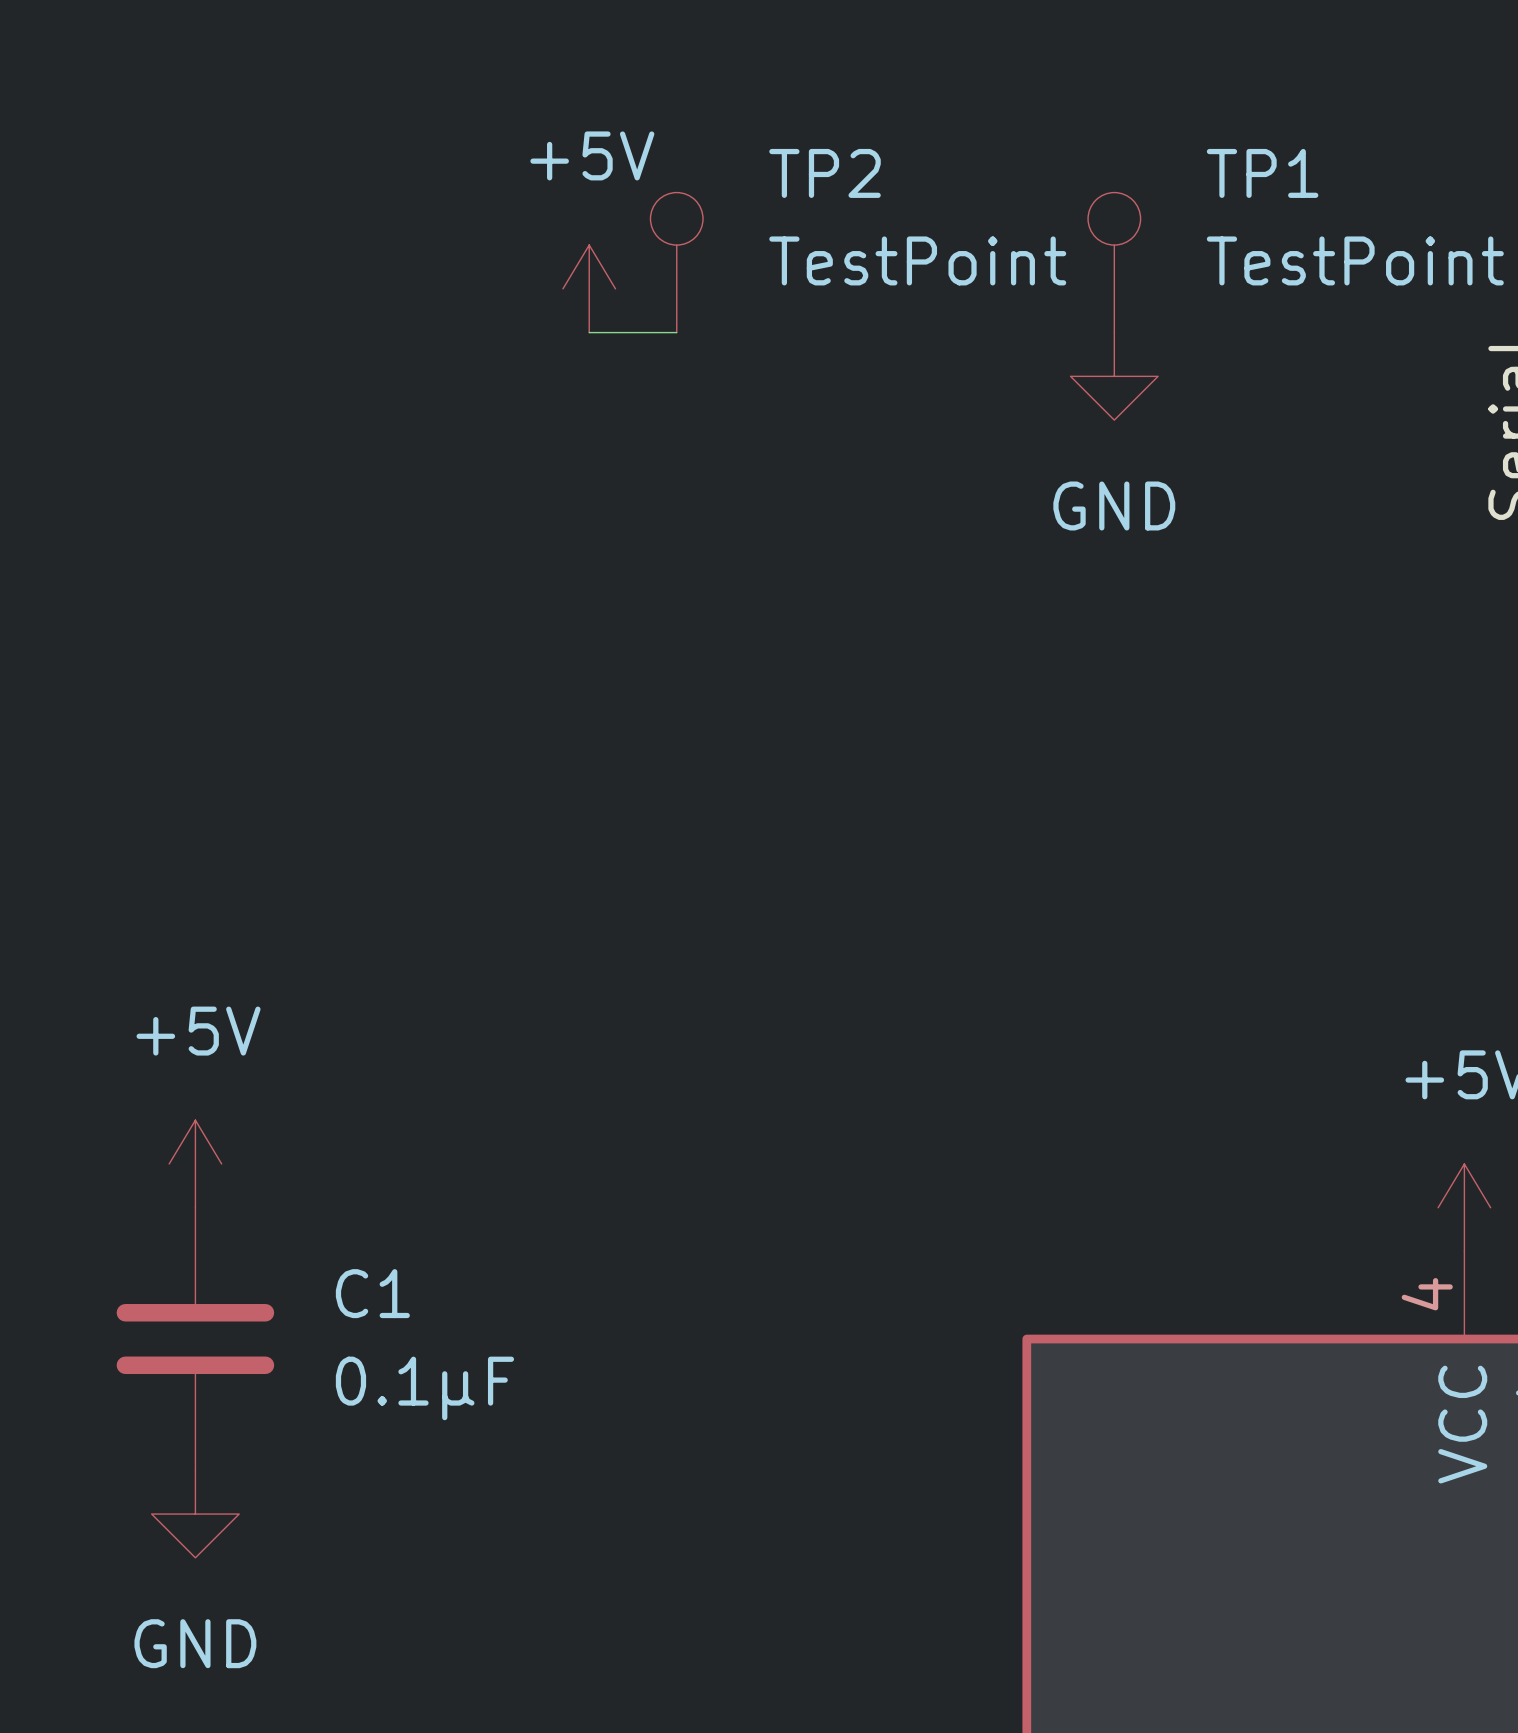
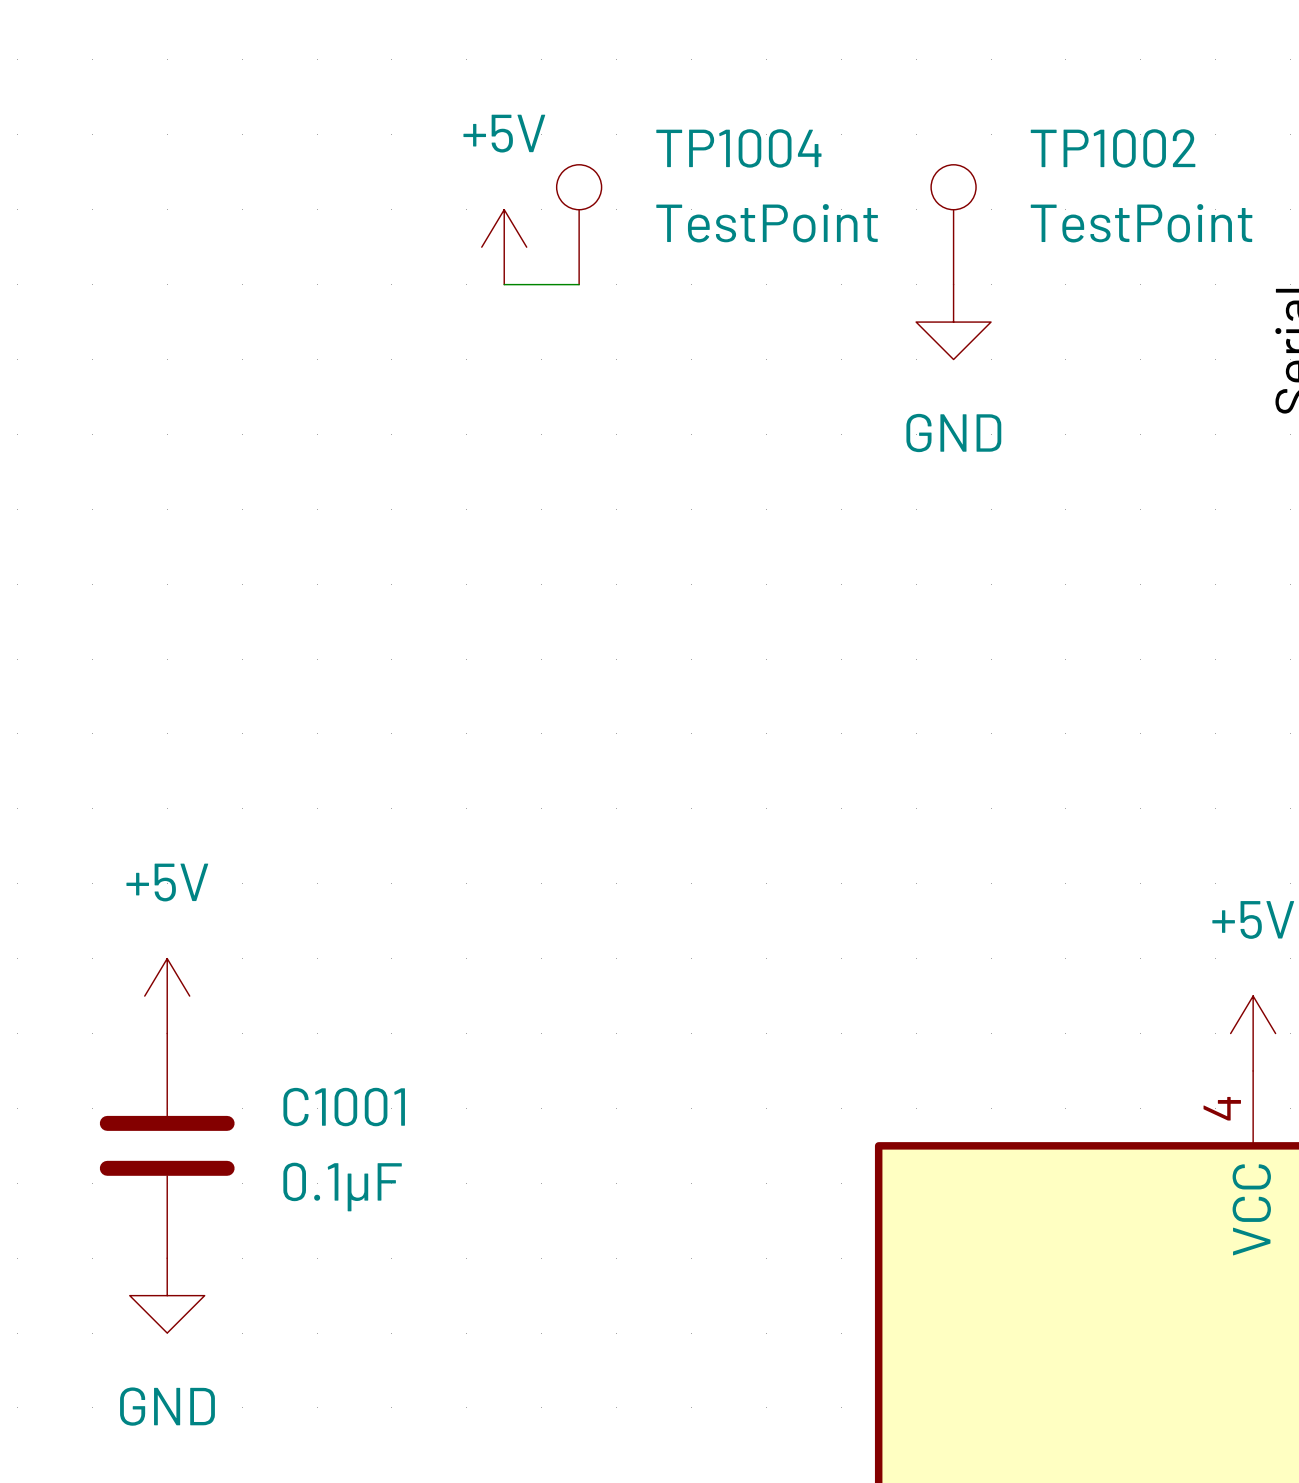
TP2 name: TP2 (825, 173) -> TP1004 (738, 148)
TP1 name: TP1 (1262, 173) -> TP1002 (1113, 148)
C1 name: C1 (372, 1293) -> C1001 (344, 1107)

